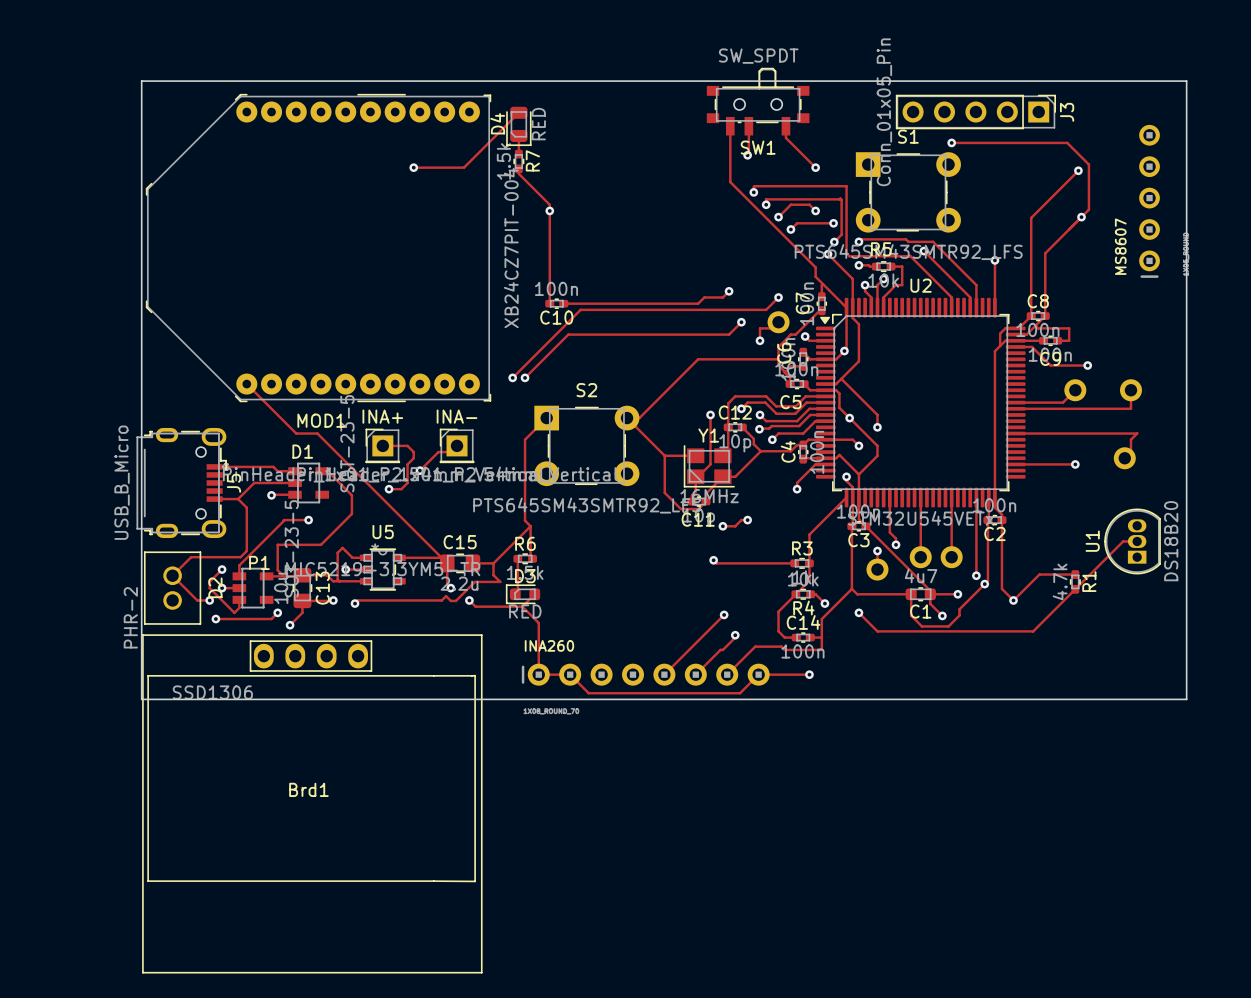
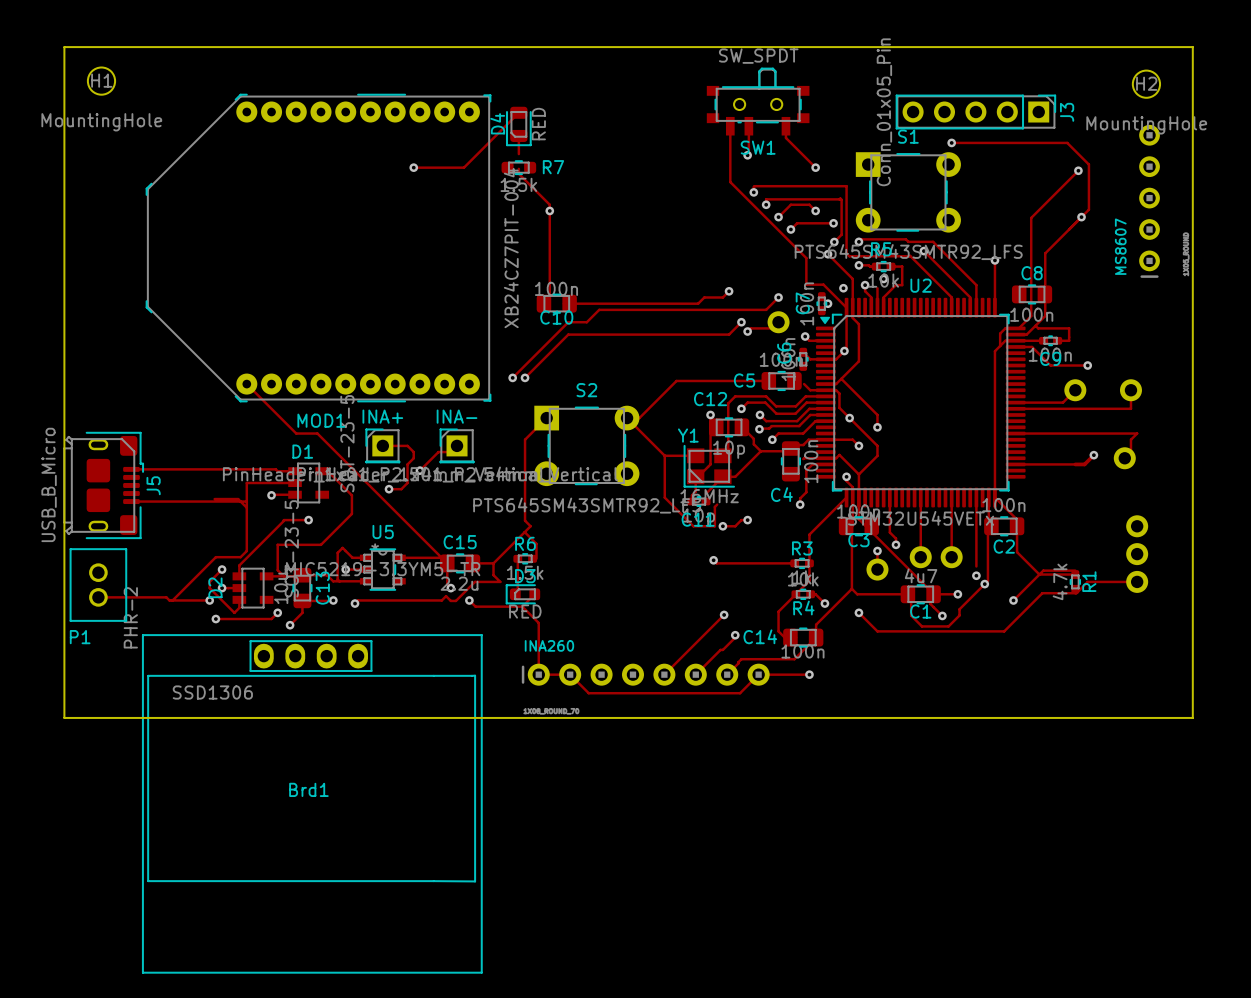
H1: none -> MountingHole (101, 81)
board edge: (141, 81) (1186, 81) (1186, 699) (141, 699) (141, 81) -> (64, 47) (64, 717) (1192, 717) (1192, 47) (64, 47)
H2: none -> MountingHole (1146, 84)
R7 footprint: [513, 149, 525, 174] -> [501, 160, 537, 175]
track: (806, 258) (815, 267) (815, 276) (823, 284) -> (806, 258) (806, 284) (823, 284)
track: (883, 278) (877, 285) (877, 288) -> none
track: (822, 284) (821, 296) -> none
via: none -> (843, 288)
C10 footprint: [545, 298, 569, 309] -> [536, 293, 577, 314]
via: none -> (828, 303)
track: (599, 309) (580, 309) (568, 322) -> (599, 309) (586, 322) (568, 322)
track: (821, 310) (795, 334) (790, 334) (778, 346) (778, 365) (784, 371) -> none
C8 footprint: [1026, 310, 1050, 322] -> [1011, 284, 1053, 305]
track: (760, 328) (760, 340) -> (760, 328) (750, 328) (747, 331)
via position: (760, 340) -> (747, 331)
track: (778, 359) (698, 359) (676, 380) -> (765, 384) (768, 380) (676, 380)
track: (803, 366) (790, 366) (784, 372) (790, 377) (790, 384) -> none
C5 footprint: [785, 378, 809, 390] -> [761, 371, 802, 391]
C5 name position: C5 (790, 402) -> C5 (744, 380)
C12 footprint: [723, 422, 747, 433] -> [708, 417, 750, 438]
J5 footprint: [136, 427, 229, 539] -> [63, 432, 144, 539]
Y1 name position: Y1 (708, 435) -> Y1 (688, 435)
C4 footprint: [798, 440, 809, 464] -> [781, 441, 801, 482]
C4 name position: C4 (788, 451) -> C4 (781, 494)
track: none -> (1093, 455) (1084, 464) (1075, 464)
track: (815, 464) (797, 482) (797, 489) -> (815, 464) (812, 464) (806, 470) (806, 492) (800, 498) (800, 504)
via position: (1075, 464) -> (1093, 455)
track: (214, 466) (273, 466) (275, 469) -> (131, 469) (275, 469)
track: (254, 482) (238, 499) -> (254, 482) (246, 482) (246, 507)
via position: (797, 489) -> (800, 504)
track: (664, 492) (680, 509) (698, 509) (706, 501) (706, 493) -> (664, 492) (664, 497) (693, 526) (714, 526) (714, 506) (717, 504)
track: none -> (994, 497) (1017, 519) (1017, 552) (1039, 574) (1043, 570) (1075, 570)
track: none -> (131, 501) (246, 501)
track: (994, 507) (1001, 514) (1001, 588) (1013, 600) -> none
C2 footprint: [983, 514, 1007, 526] -> [984, 516, 1025, 537]
C3 footprint: [847, 521, 871, 532] -> [838, 516, 880, 537]
track: (530, 526) (530, 556) (532, 558) -> none
part: none -> (1137, 526)
track: none -> (524, 532) (536, 543) (536, 558)
U1: DS18B20 (1132, 541) -> none
track: (1137, 541) (1123, 541) (1033, 631) (1004, 631) -> (1137, 581) (1087, 581) (1076, 593) (1042, 593) (1004, 631)
part: none -> (1137, 554)
track: (215, 557) (191, 557) (172, 575) (197, 600) -> (215, 557) (172, 600)
P1 name position: P1 (259, 562) -> P1 (80, 637)
track: (976, 566) (976, 575) -> none
part: none -> (1137, 581)
C1 footprint: [905, 587, 936, 602] -> [900, 584, 941, 605]
P1 position: (172, 588) -> (98, 585)
track: none -> (98, 597) (166, 597) (169, 600) (197, 600)
track: (821, 619) (821, 649) (784, 649) (781, 646) (755, 646) (738, 663) -> (821, 619) (816, 624) (816, 637) (794, 659) (741, 659) (738, 663)
C14 name position: C14 (803, 622) -> C14 (760, 636)
C14 footprint: [791, 632, 815, 643] -> [783, 627, 824, 648]

